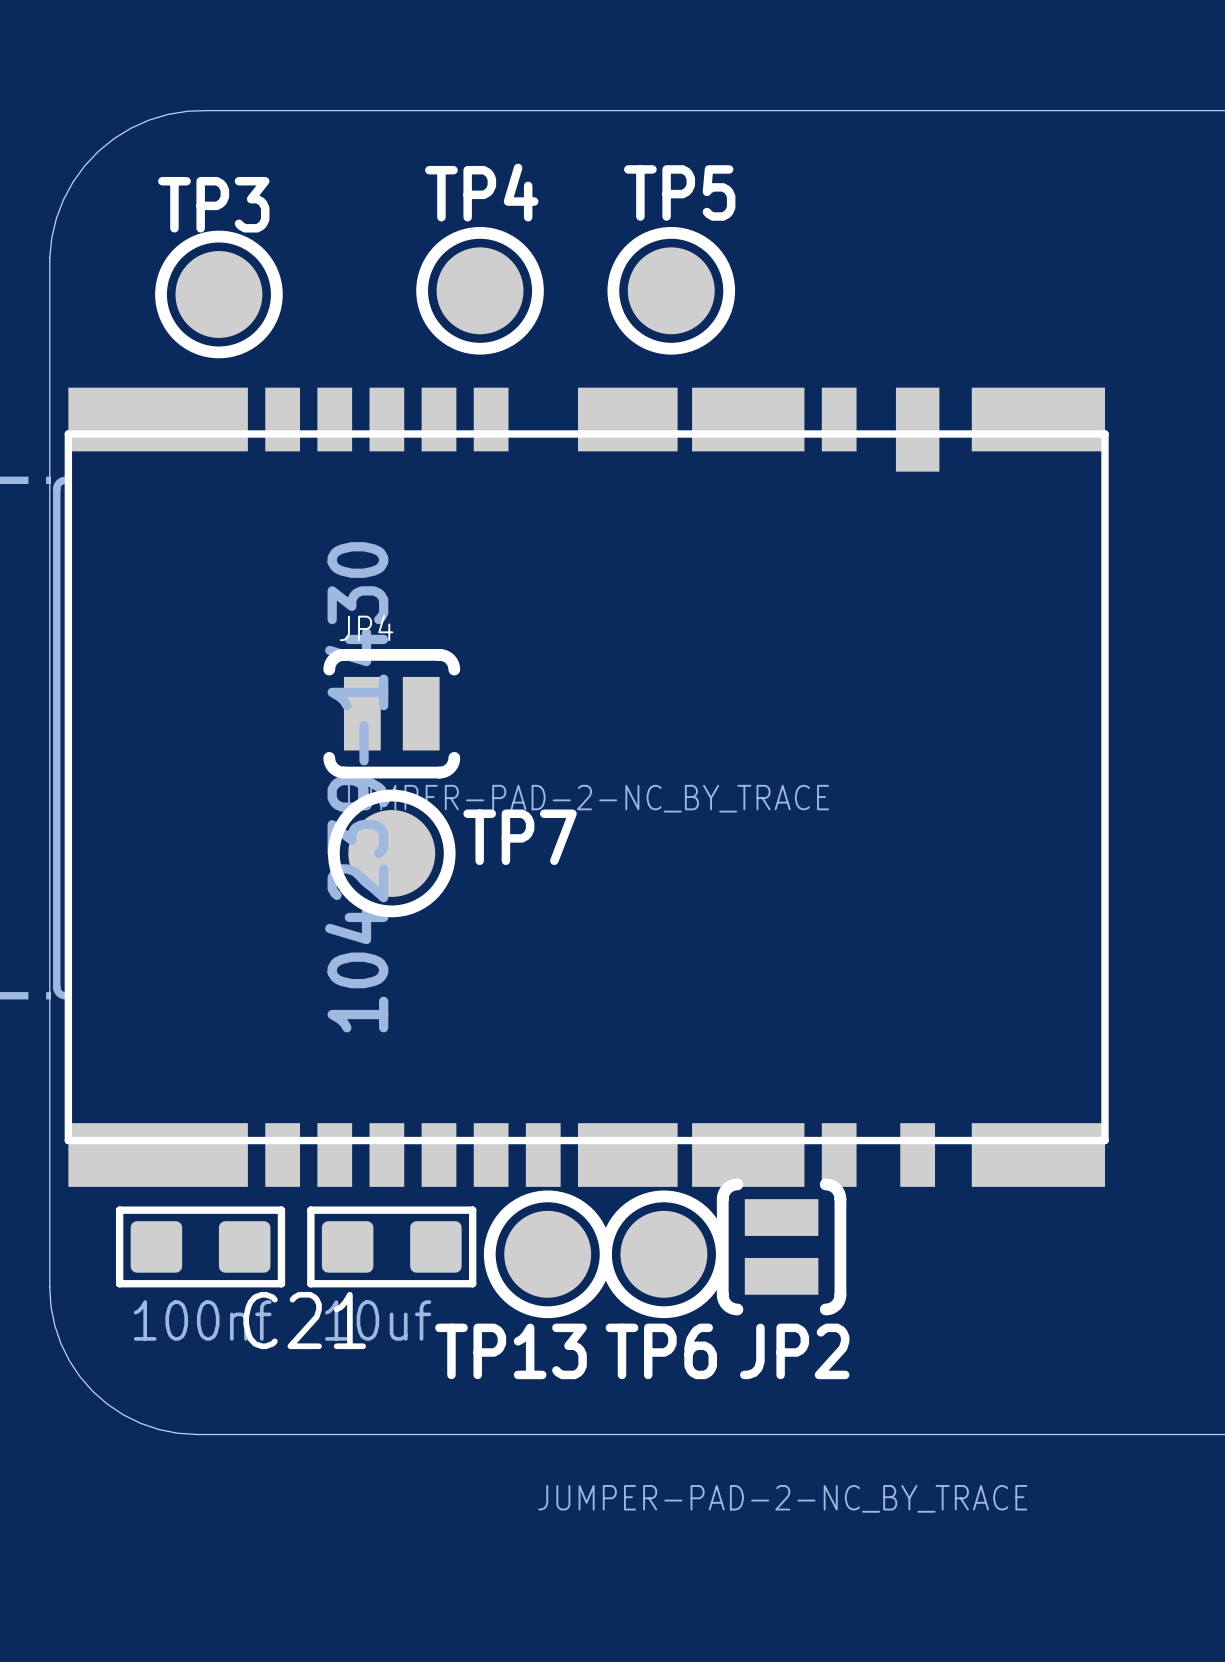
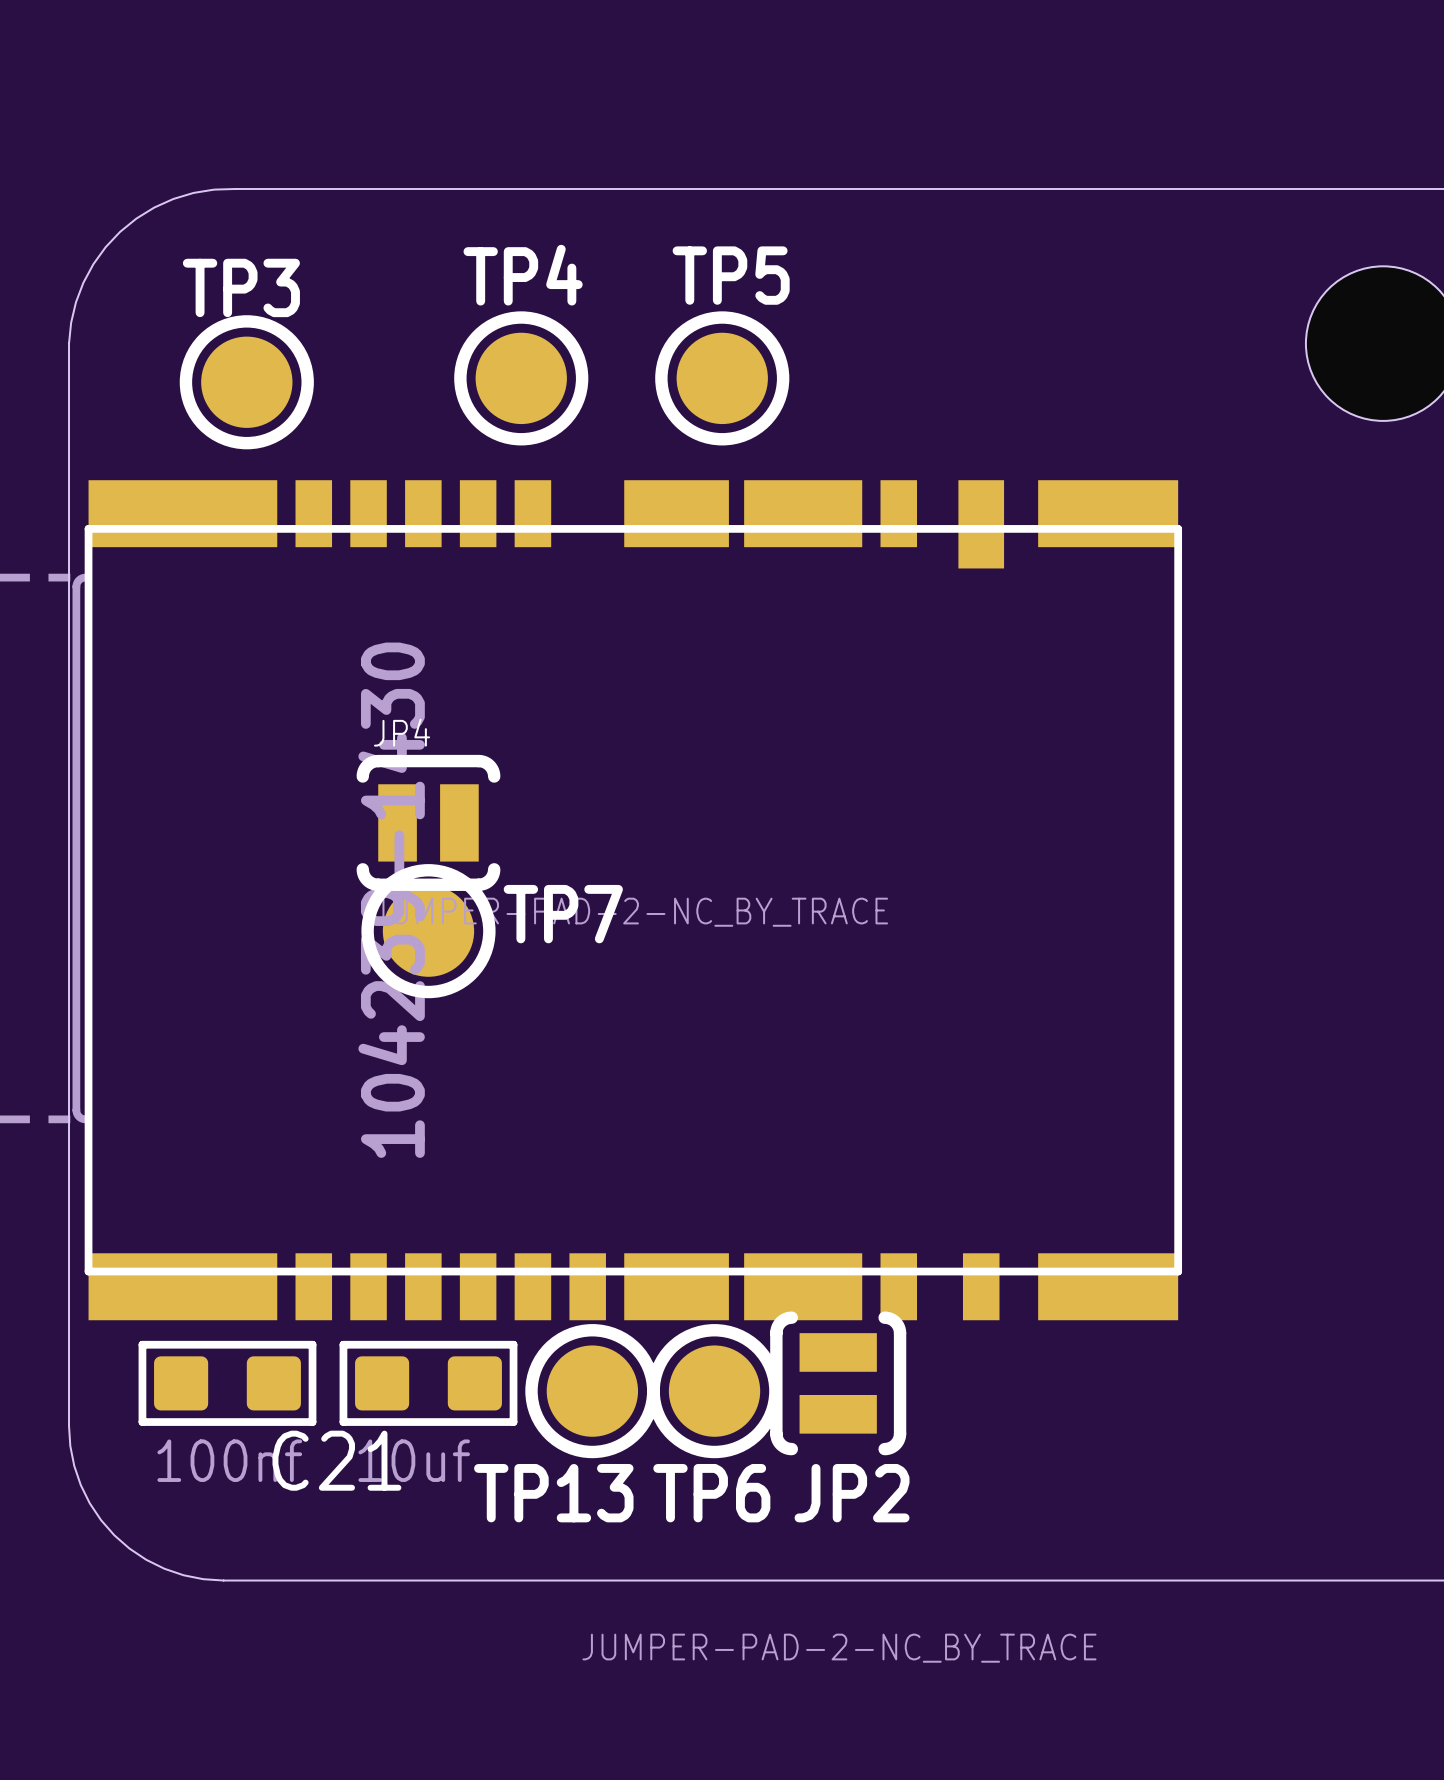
TP7 position: (391, 853) -> (428, 931)

